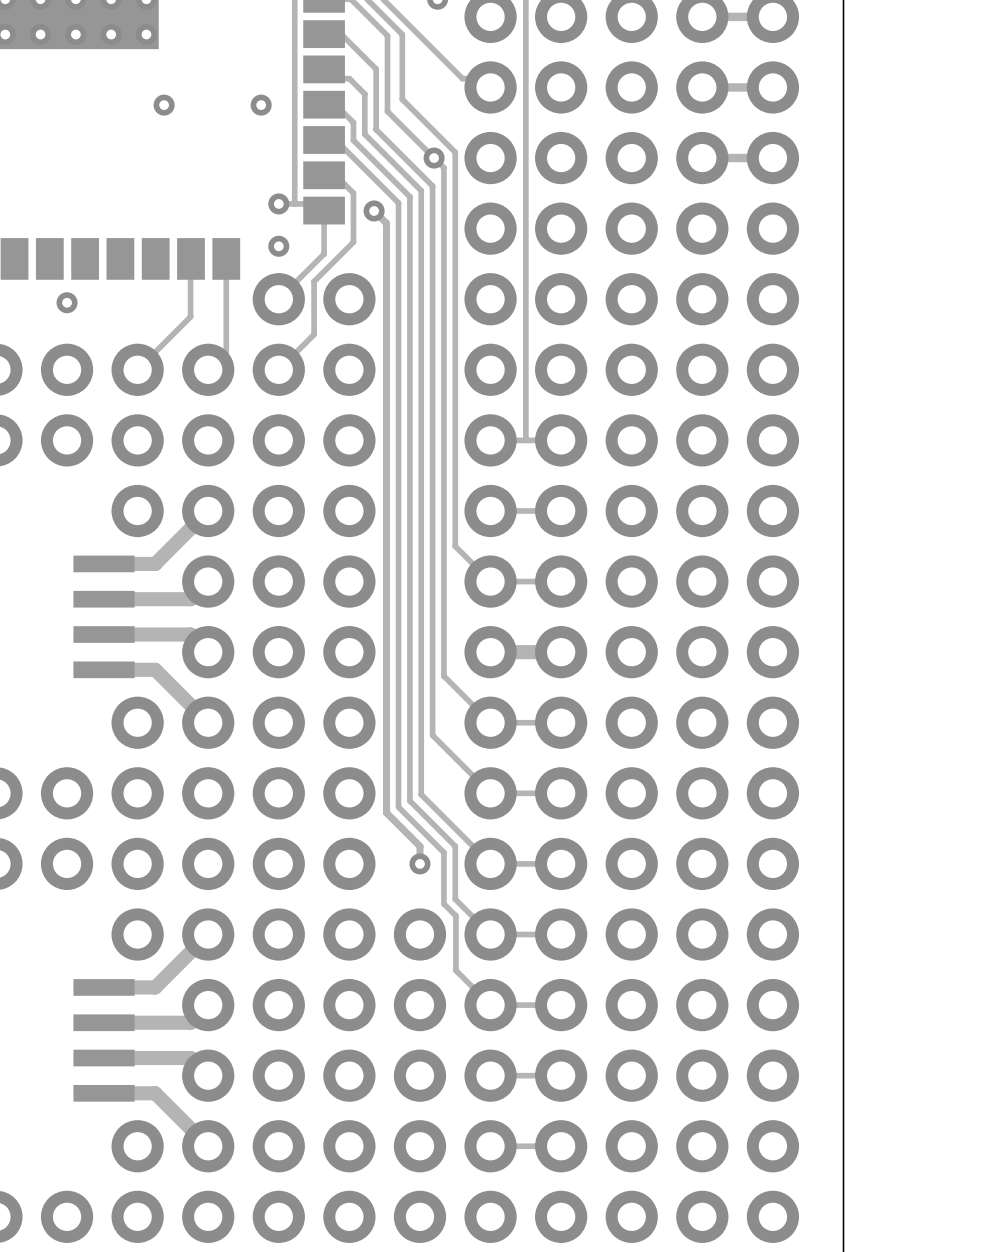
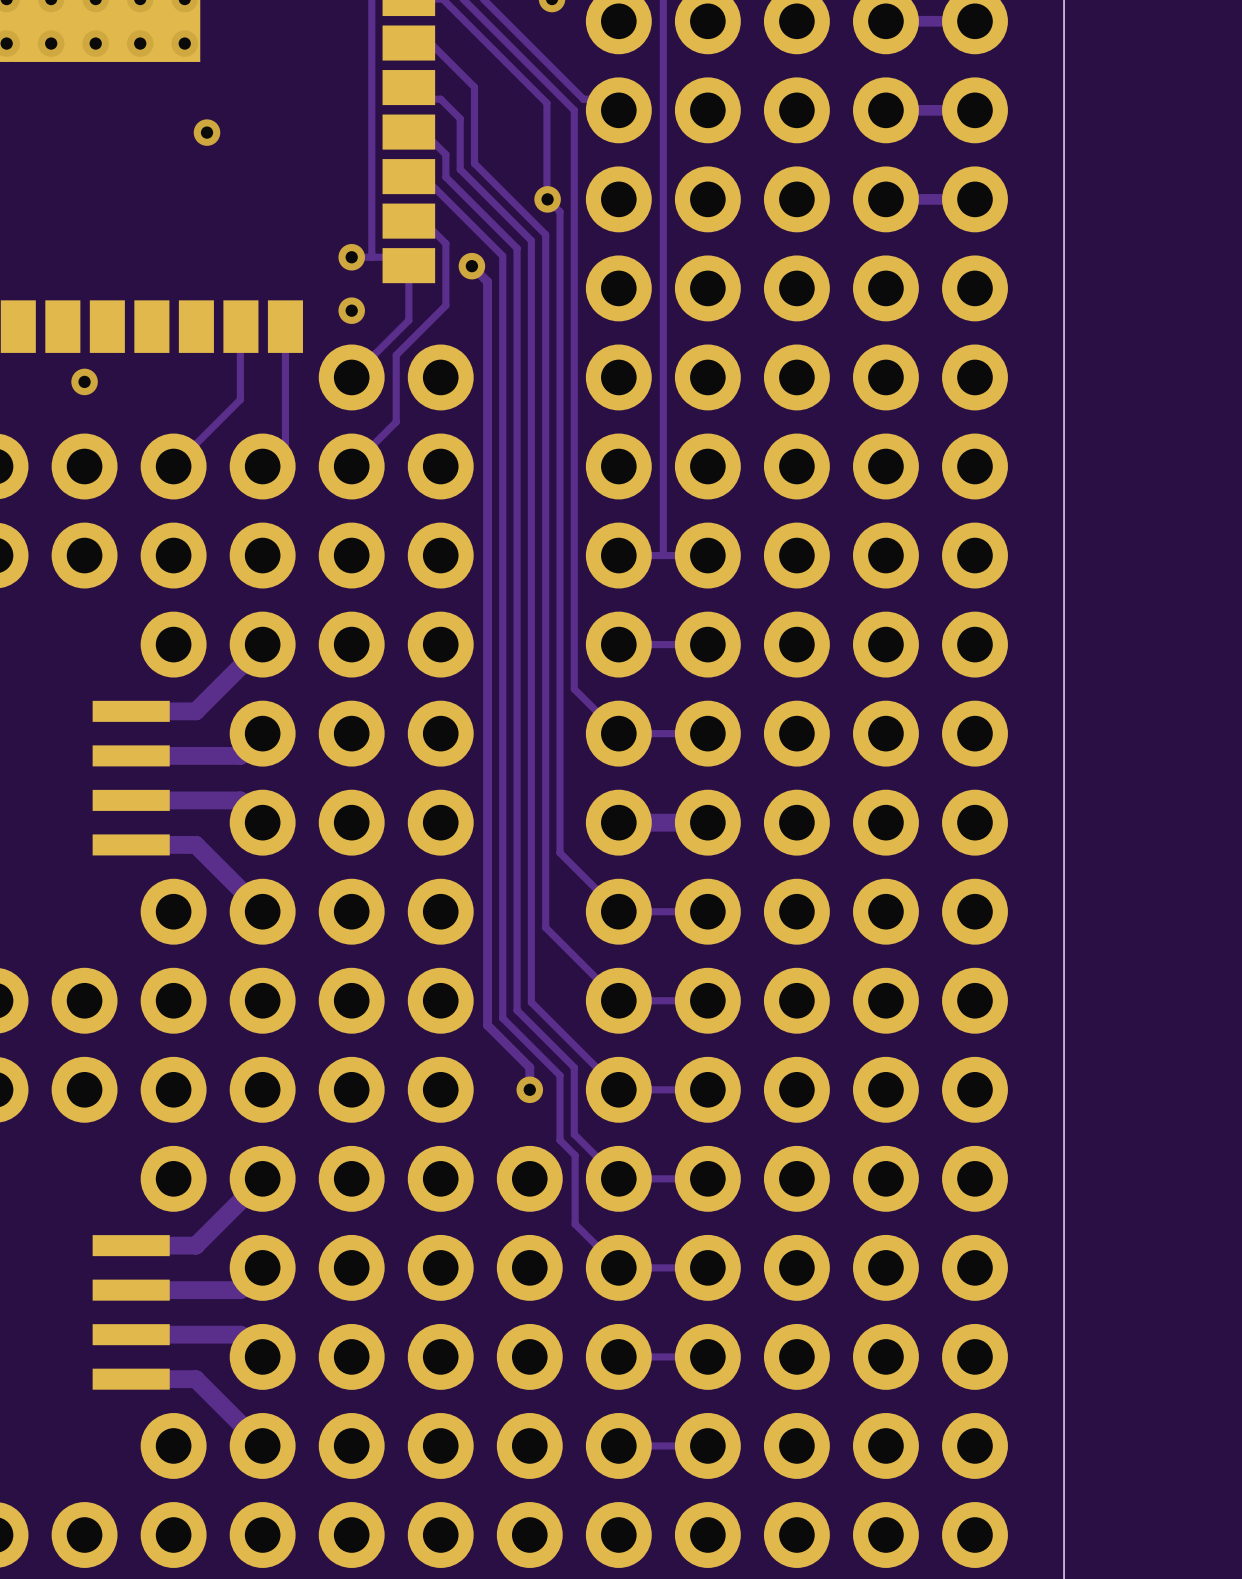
track: (402, 34) (402, 99) (455, 152) -> (507, 43) (574, 110) (574, 192)
track: (387, 35) (387, 111) (433, 157) -> (488, 45) (546, 103) (546, 198)
via: (261, 105) -> none

